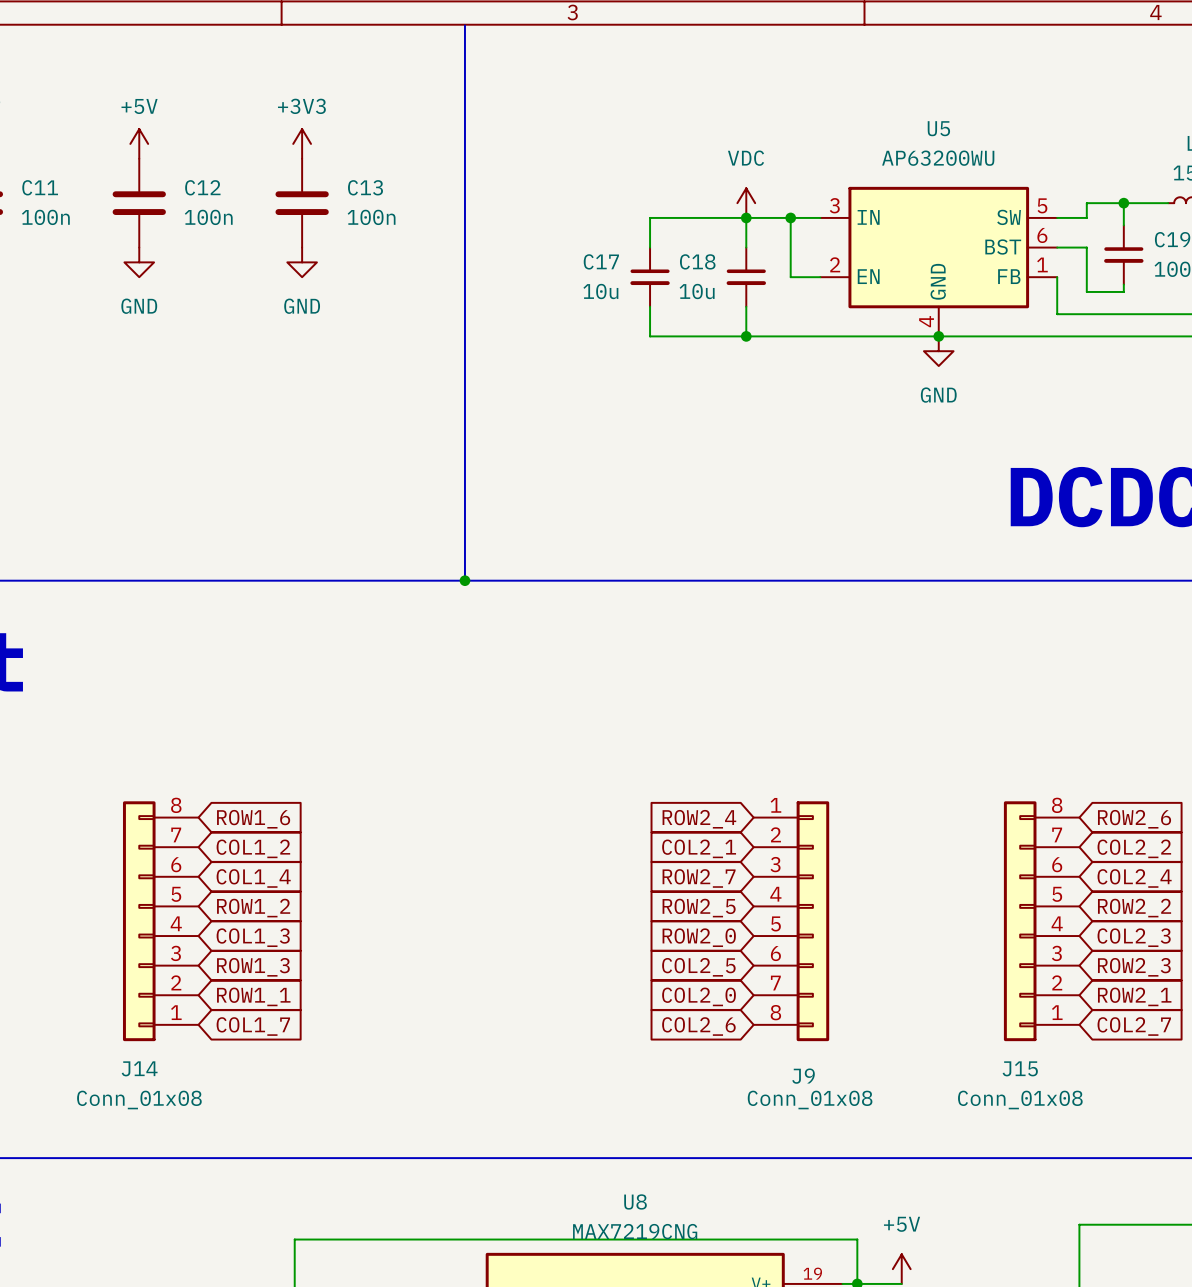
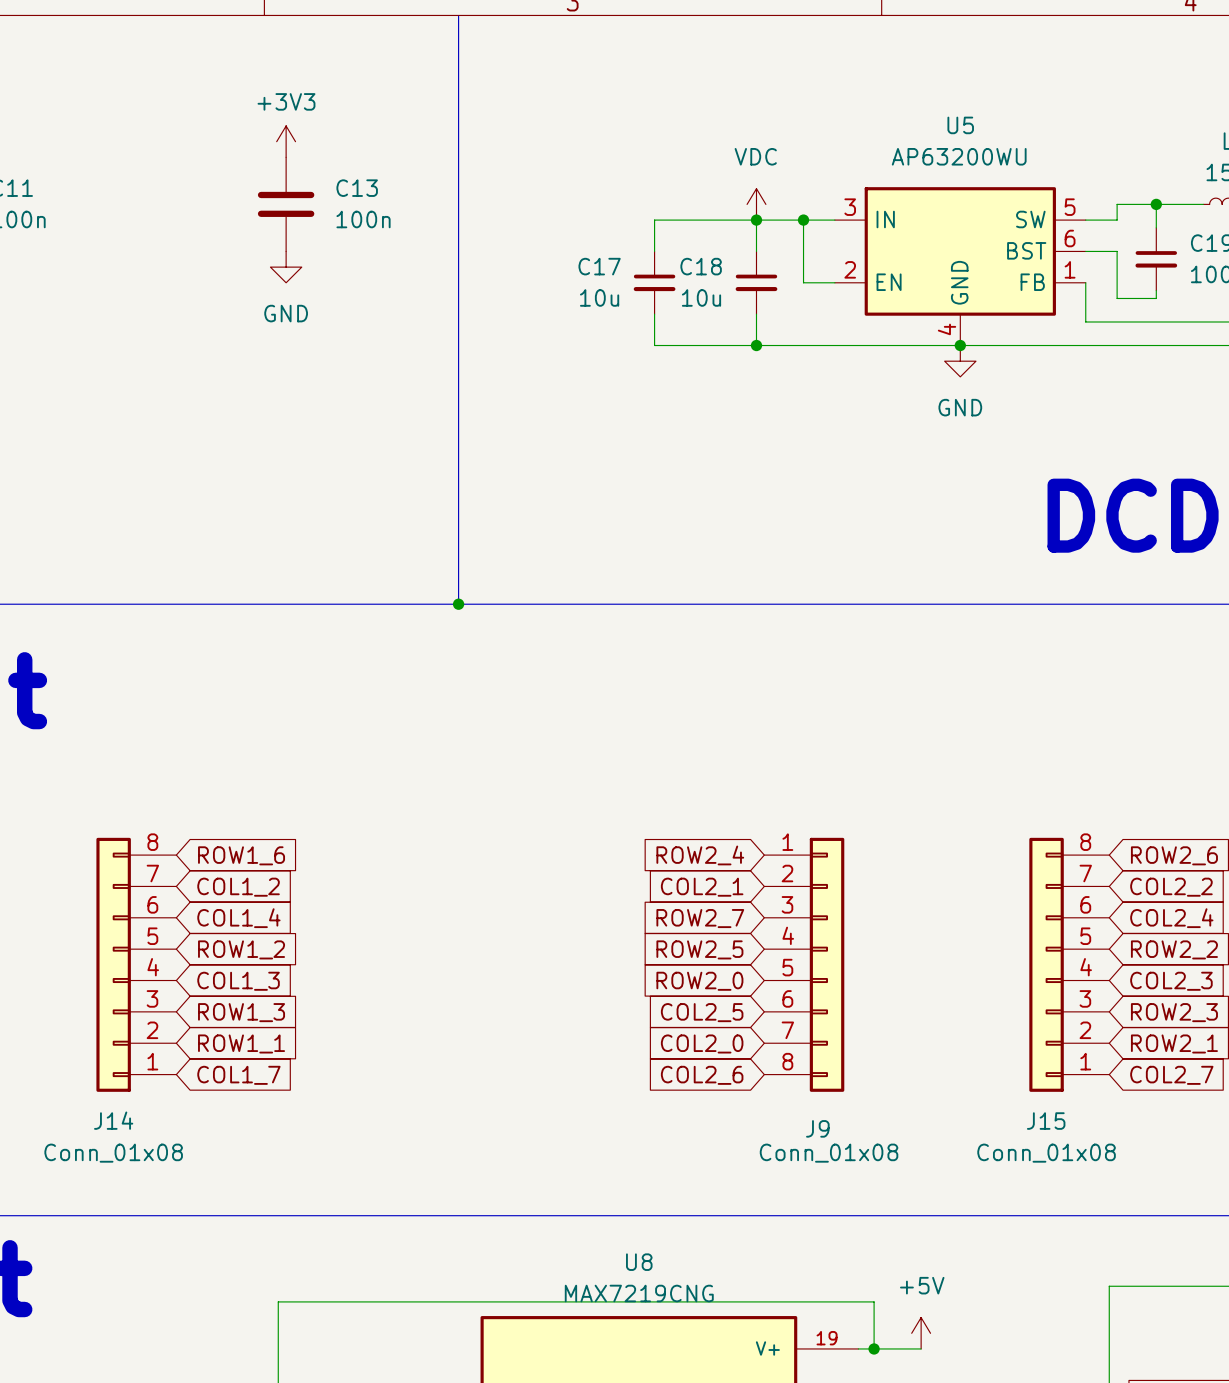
power symbol: +5V (139, 143) -> none
C12: 100n (139, 203) -> none
power symbol: GND (139, 262) -> none

